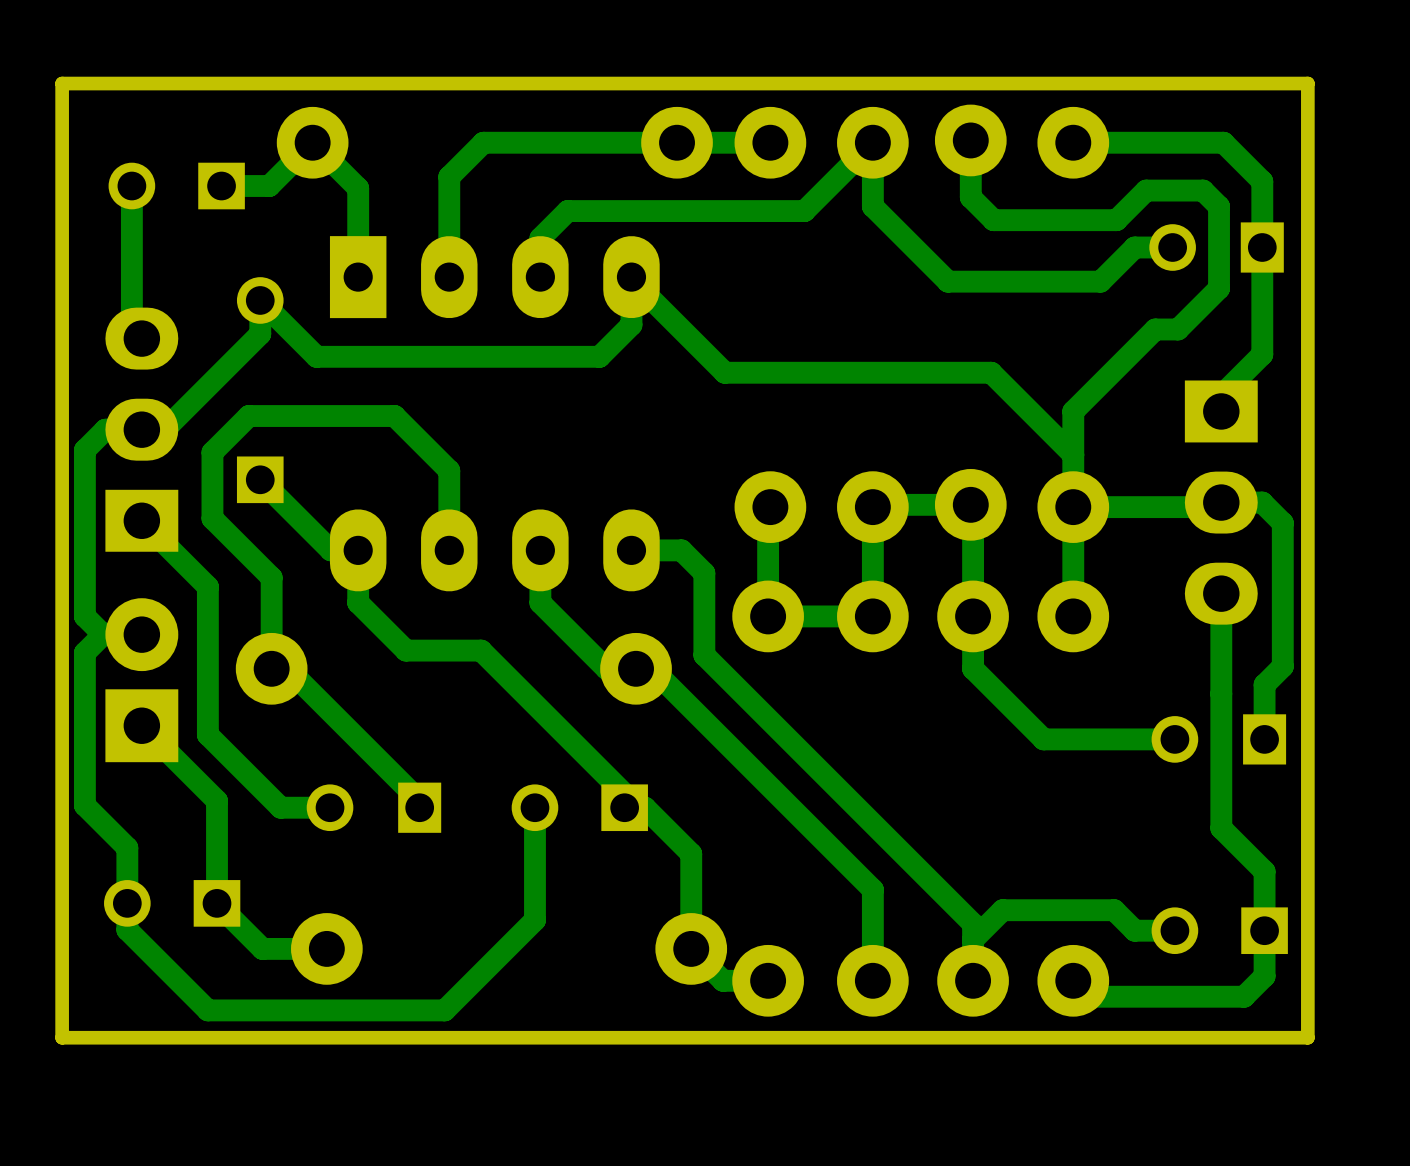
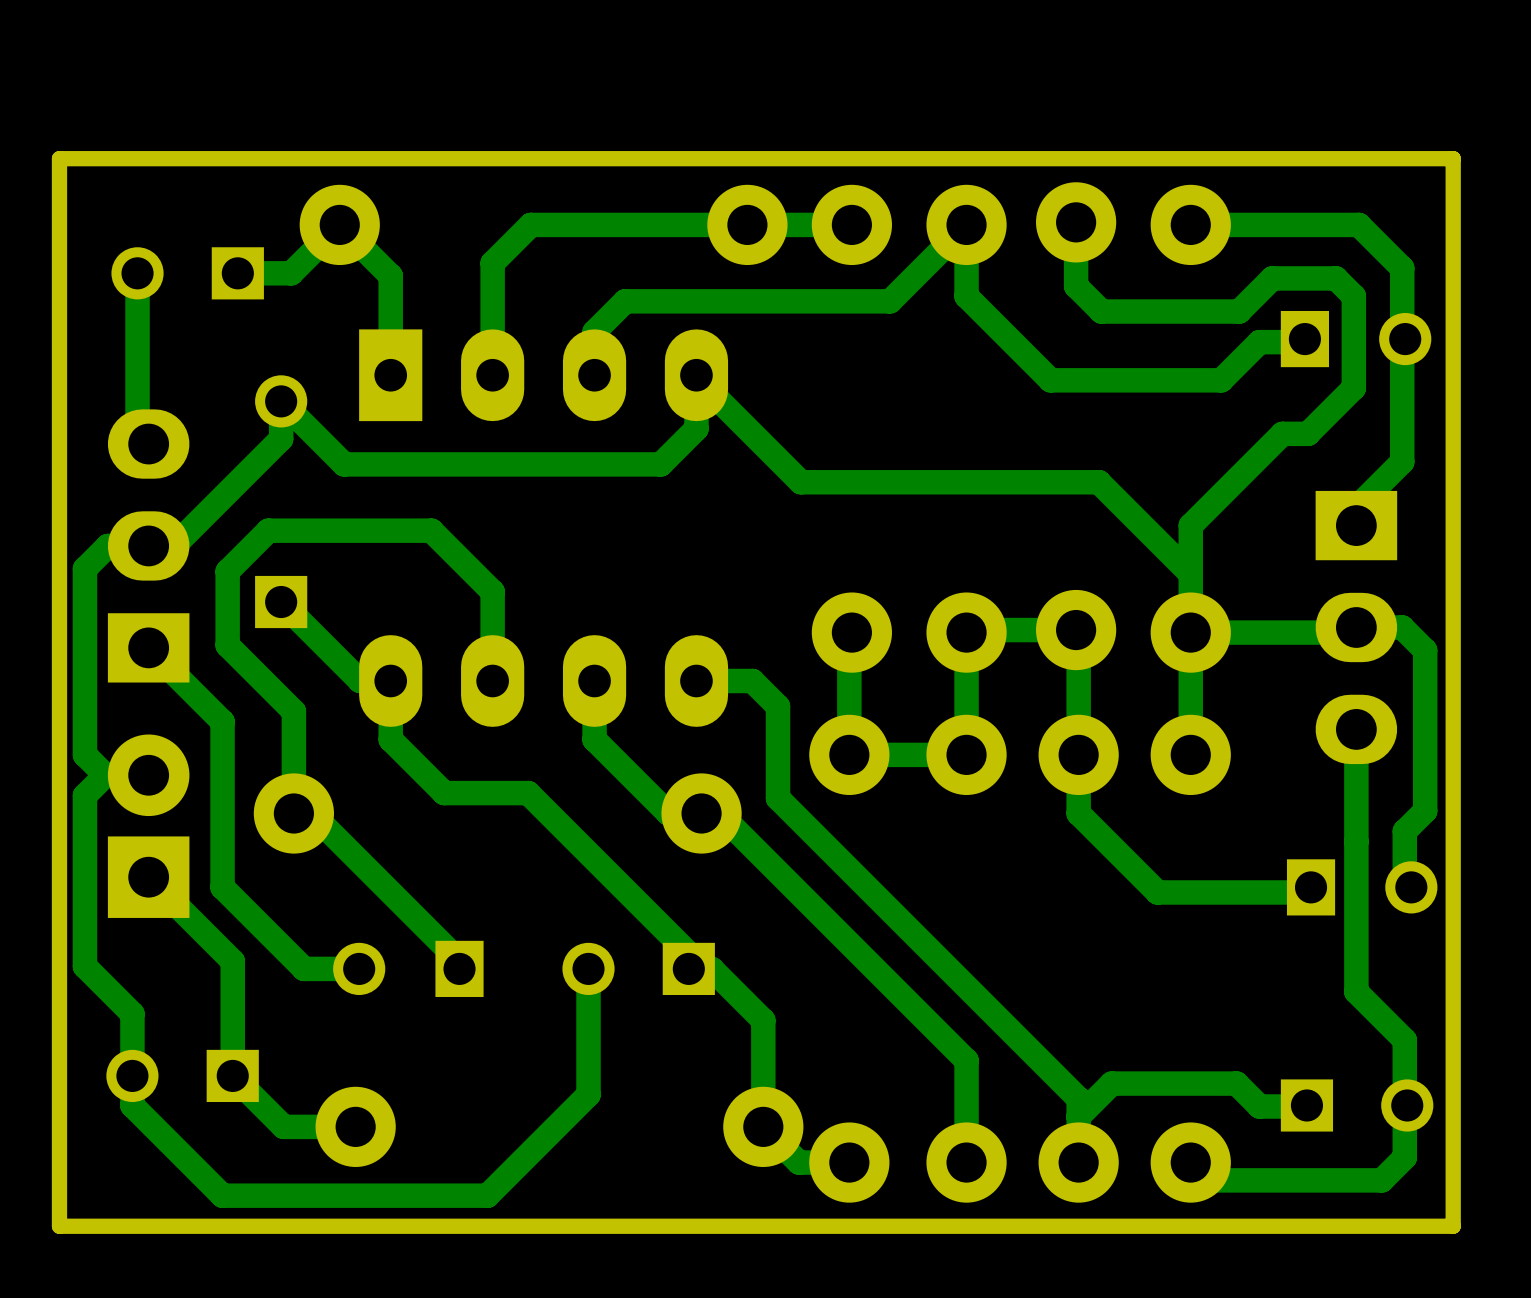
part rotation: 0° (1216, 247) -> 180° (1356, 339)
part rotation: 0° (1218, 739) -> 180° (1362, 887)
part rotation: 0° (1219, 930) -> 180° (1357, 1105)

